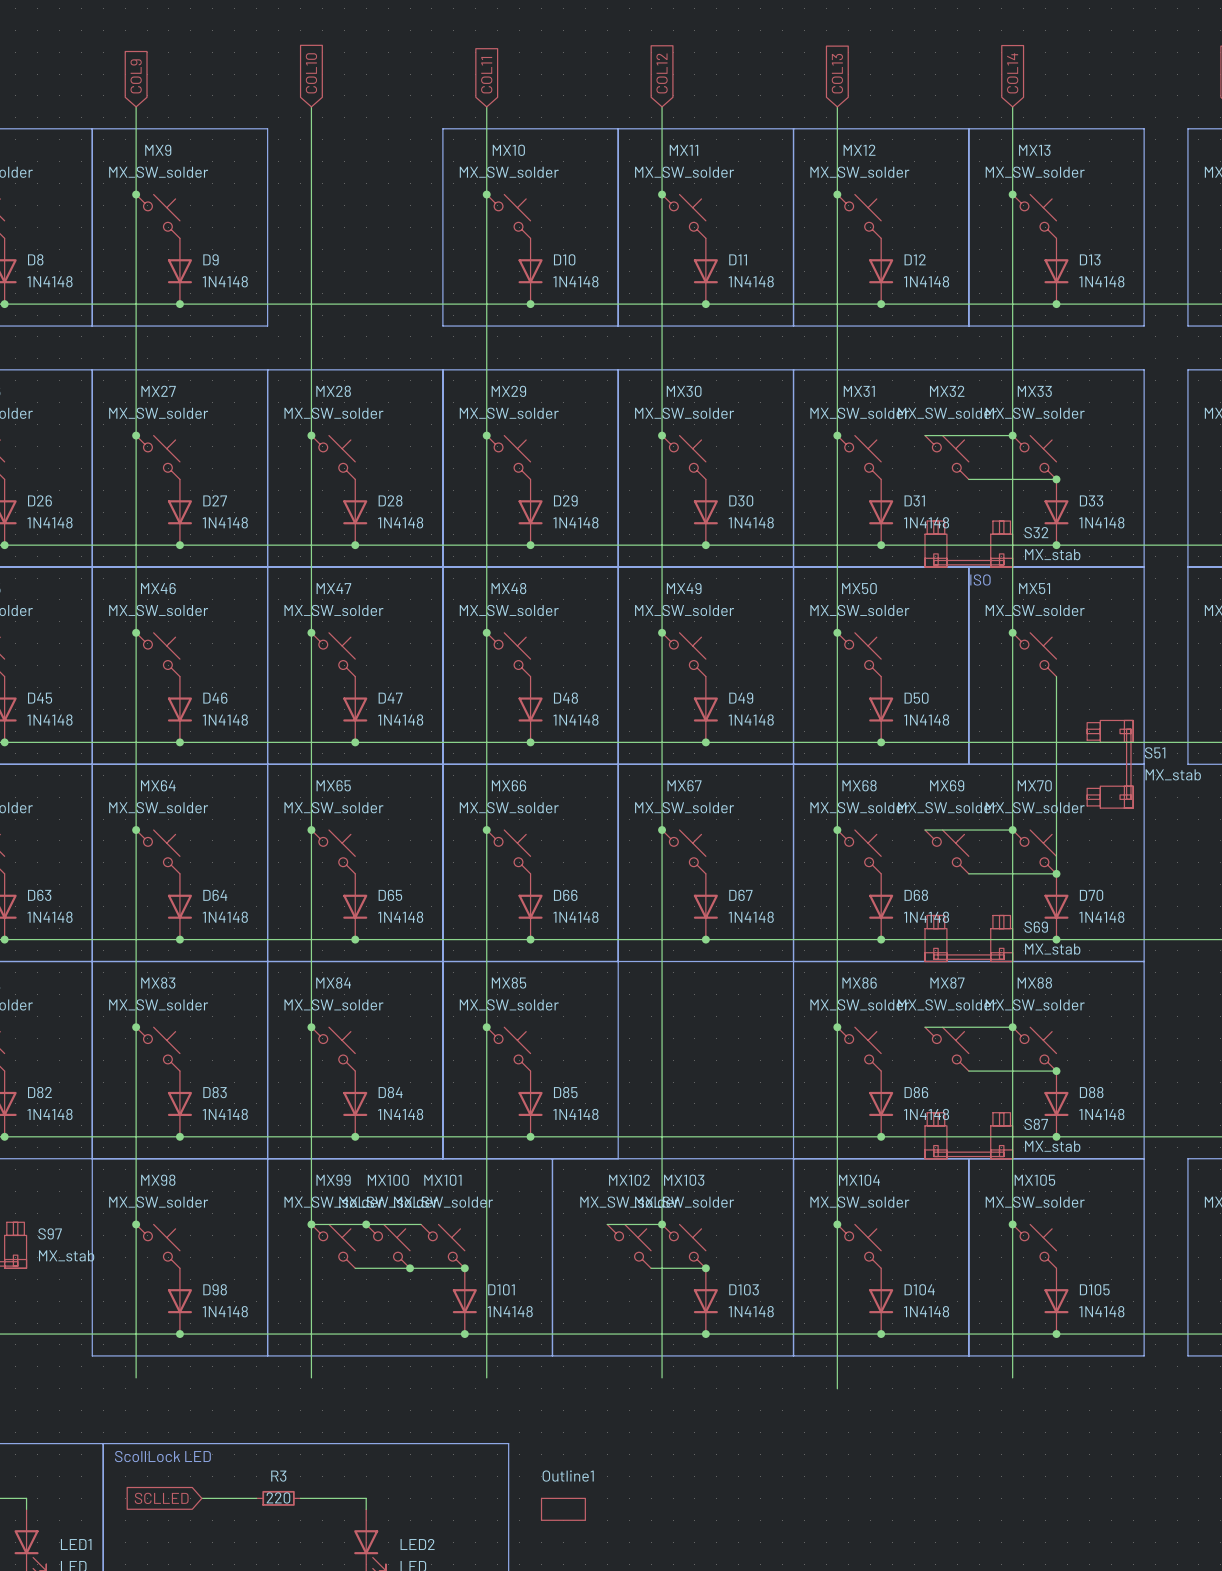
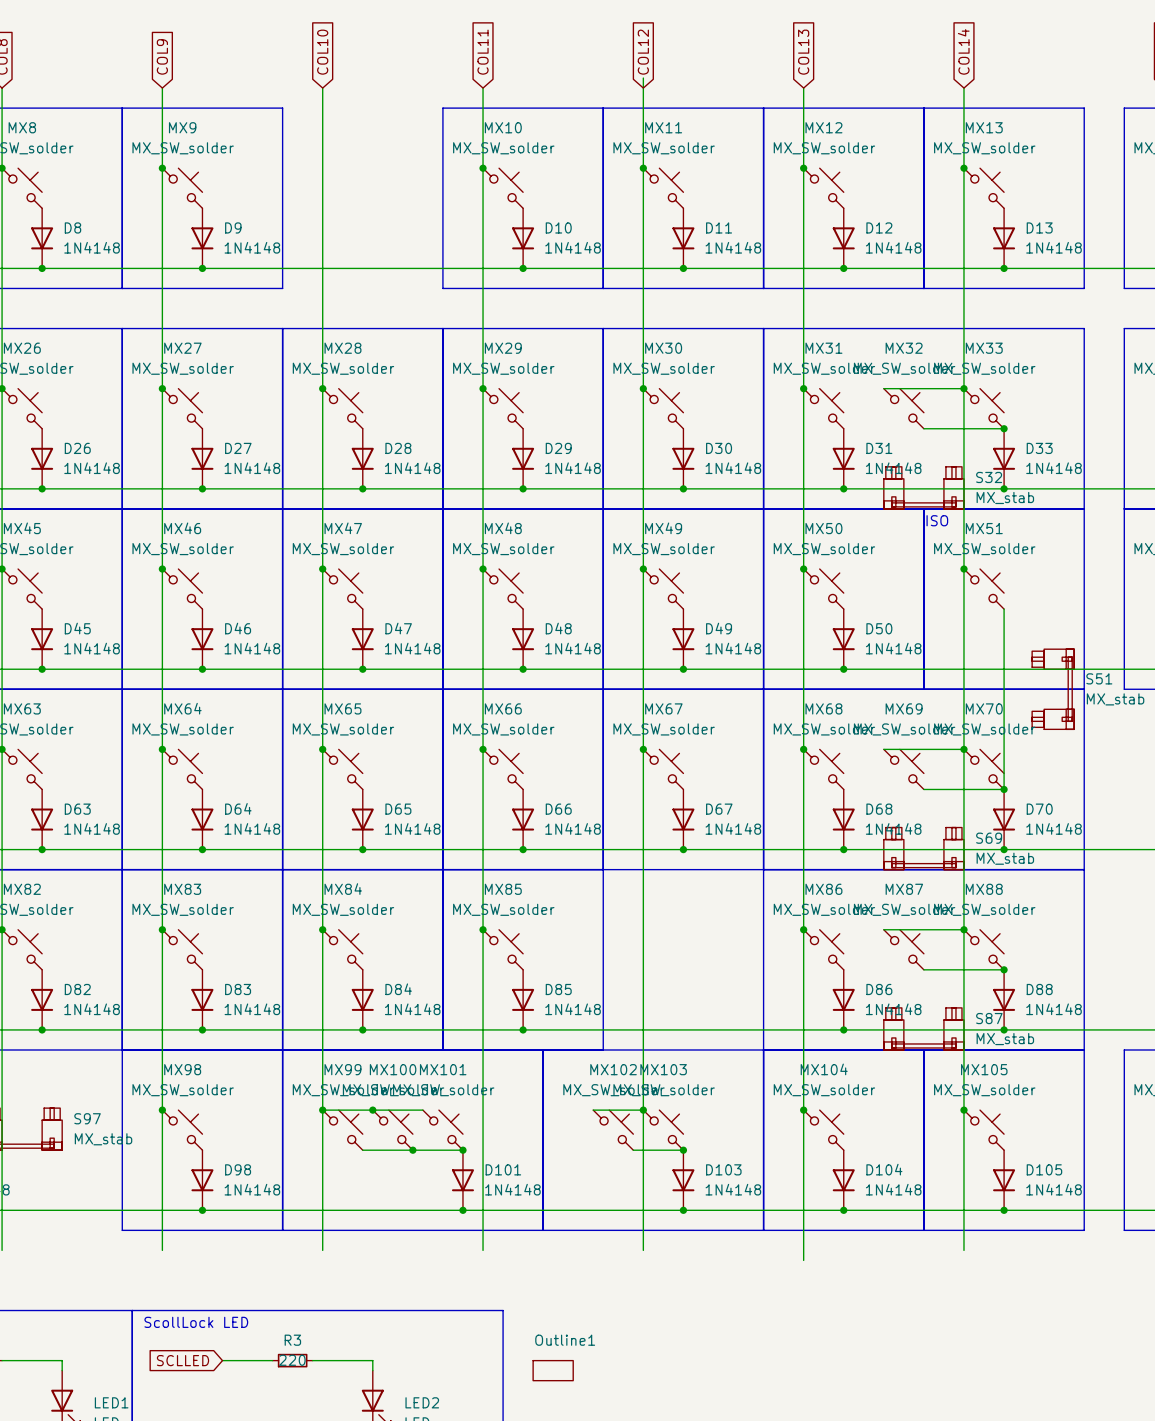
wire: none -> (643, 78) (643, 88)

